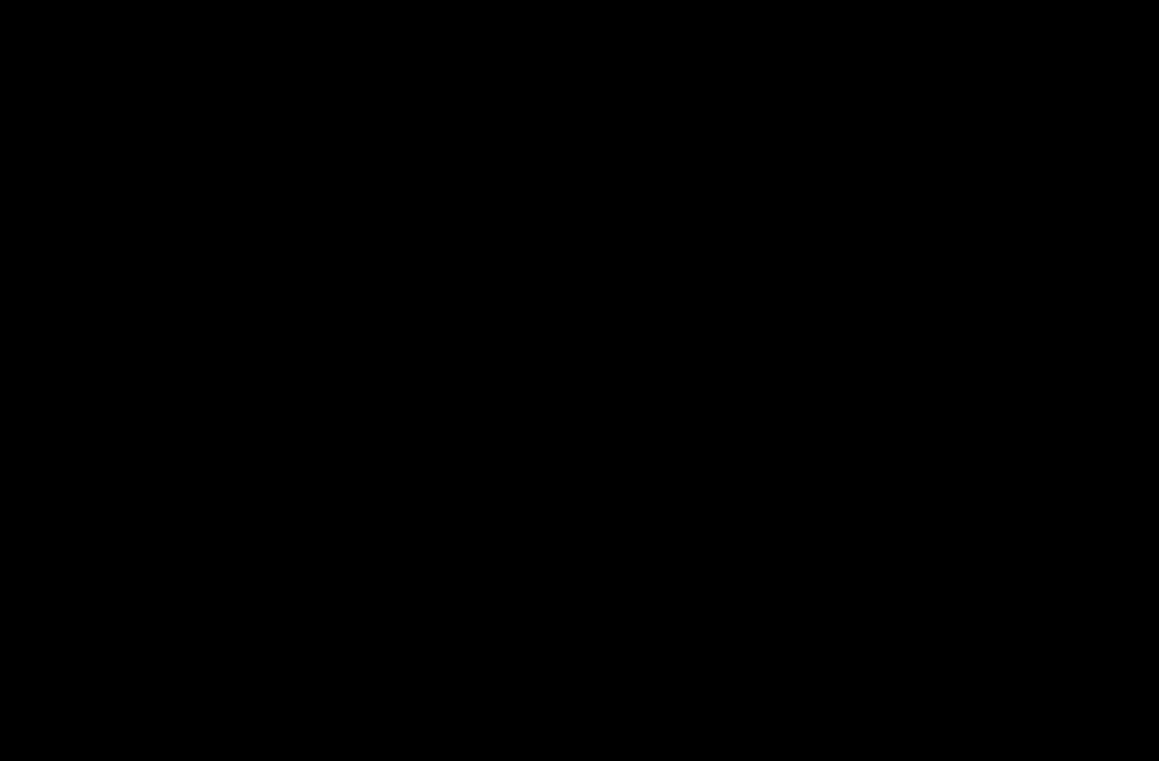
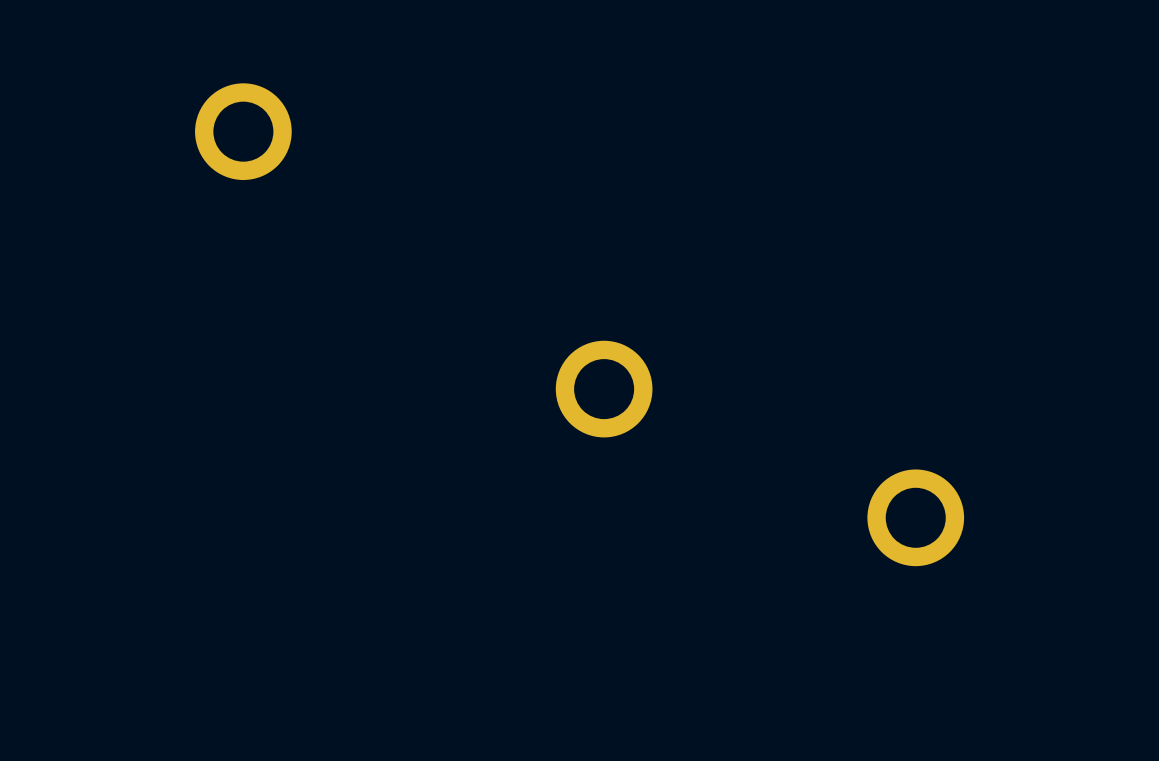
part: none -> (243, 131)
part: none -> (604, 389)
part: none -> (915, 517)

